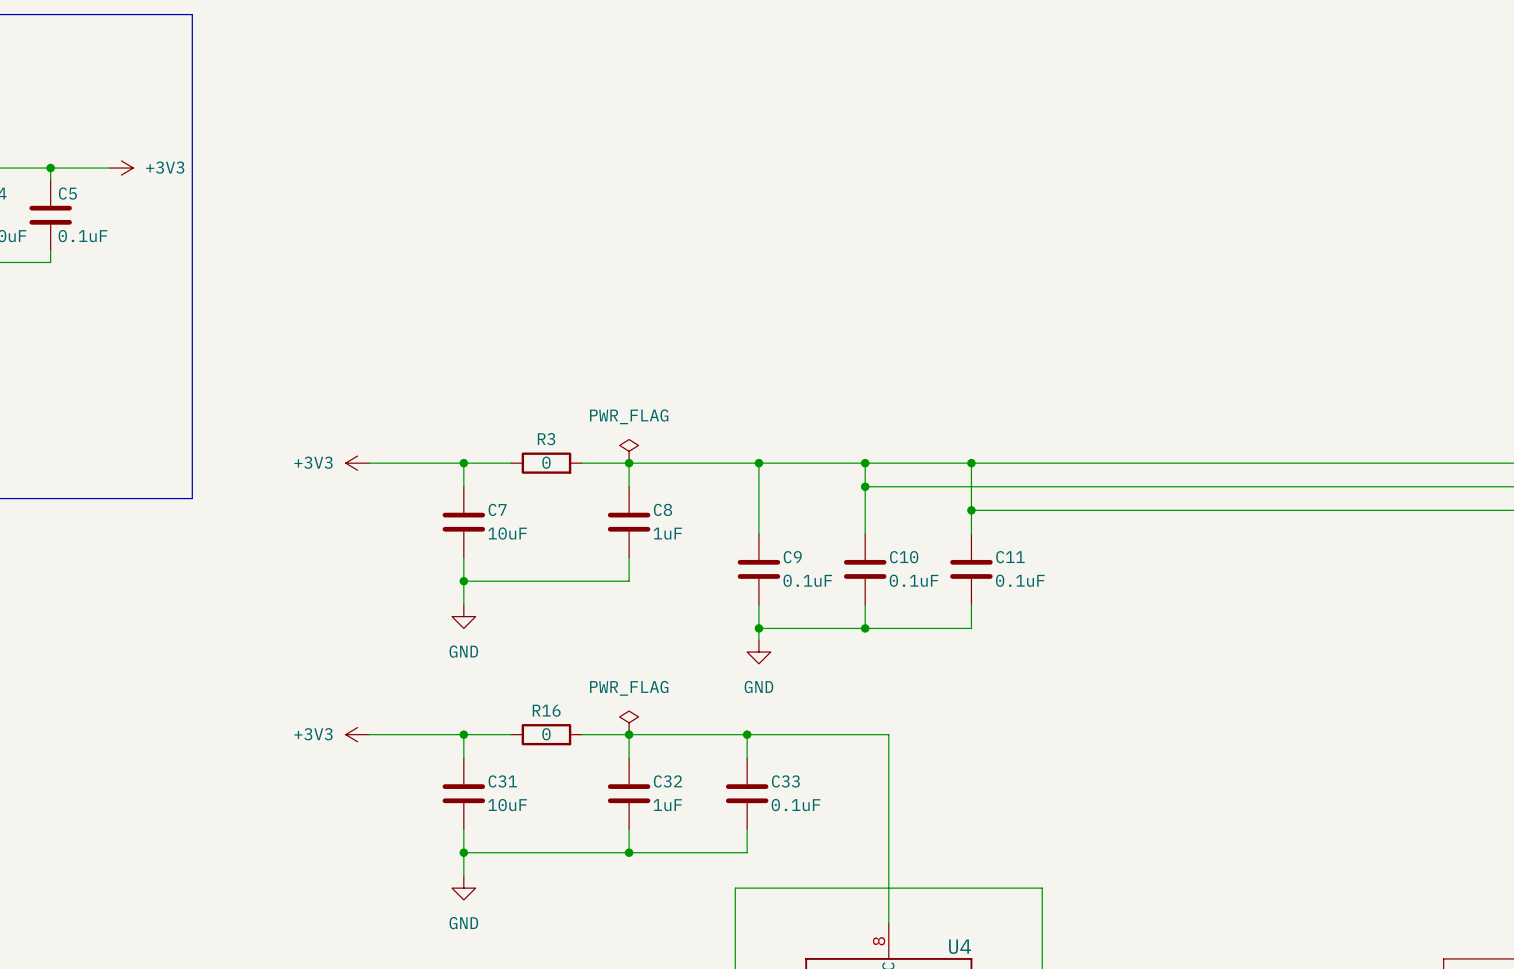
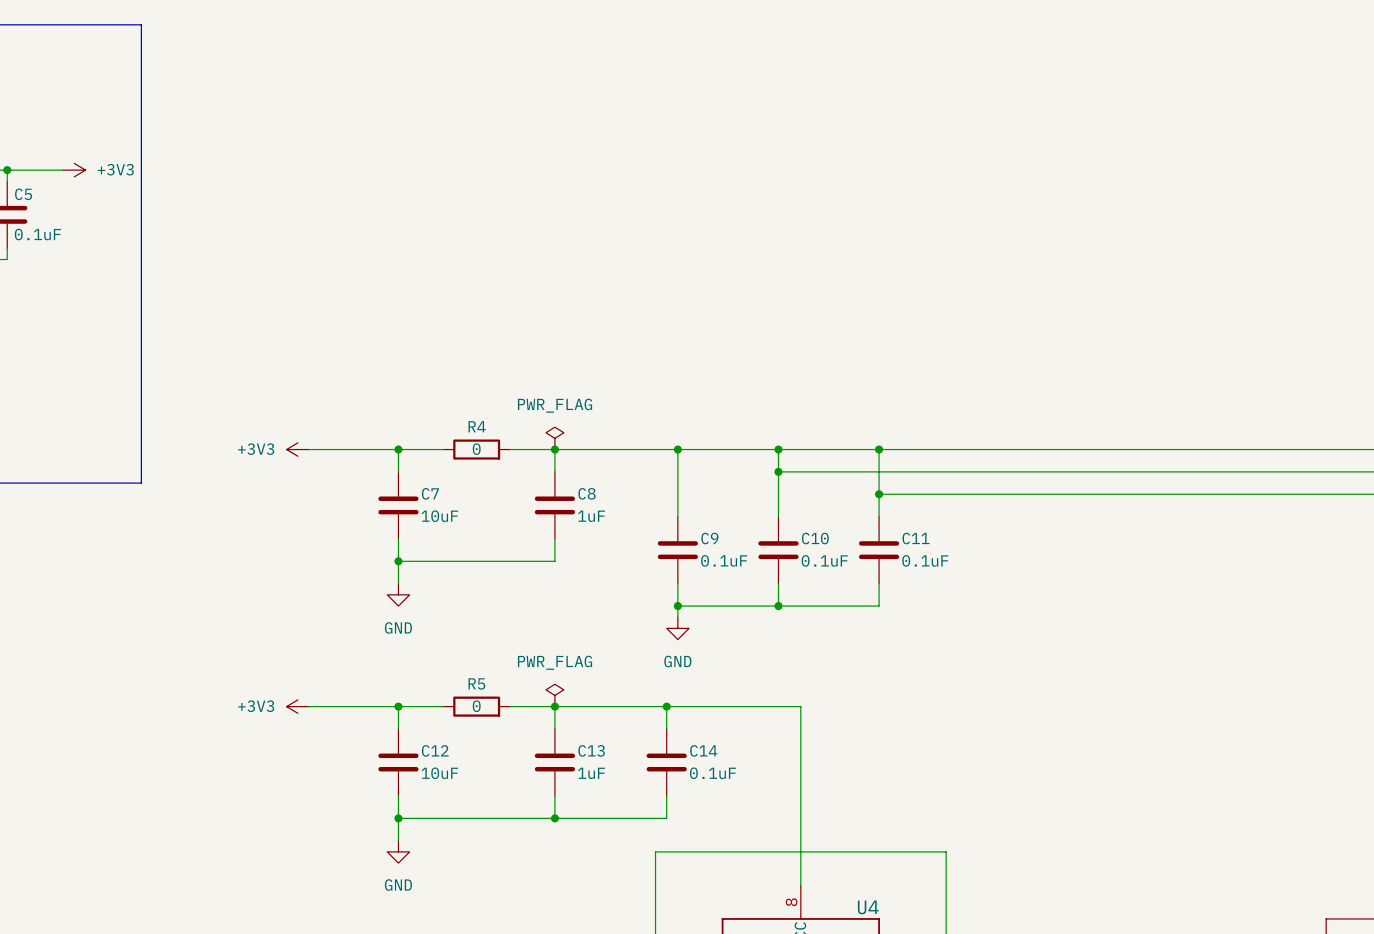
R3 name: R3 (546, 439) -> R4 (477, 426)
R16 name: R16 (546, 710) -> R5 (476, 683)
C31 name: C31 (502, 781) -> C12 (435, 750)
C32 name: C32 (667, 781) -> C13 (591, 750)
C33 name: C33 (785, 781) -> C14 (703, 750)

